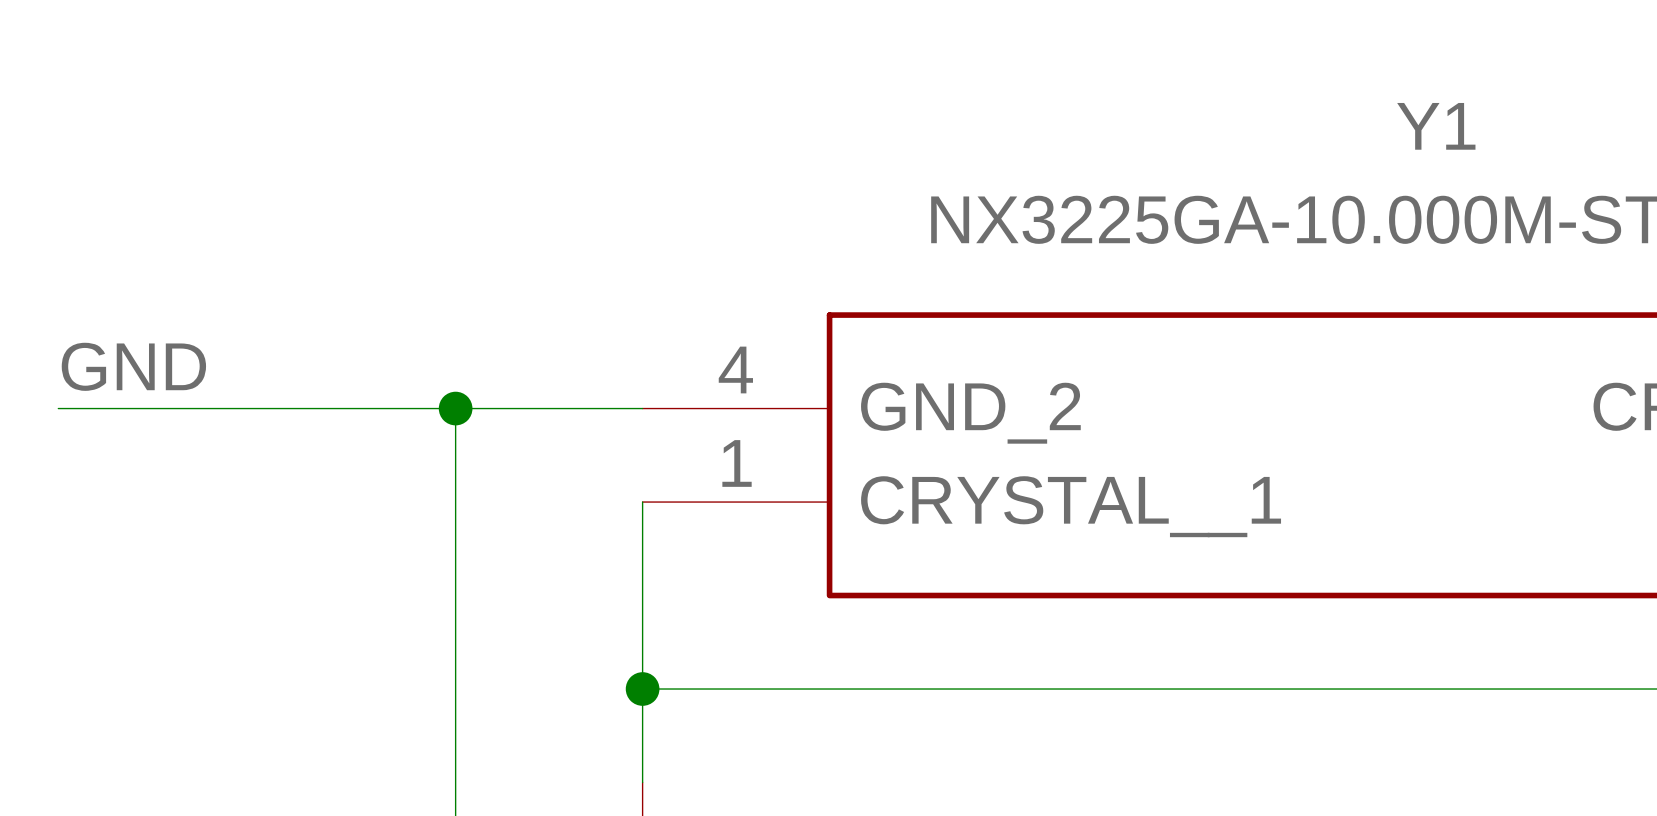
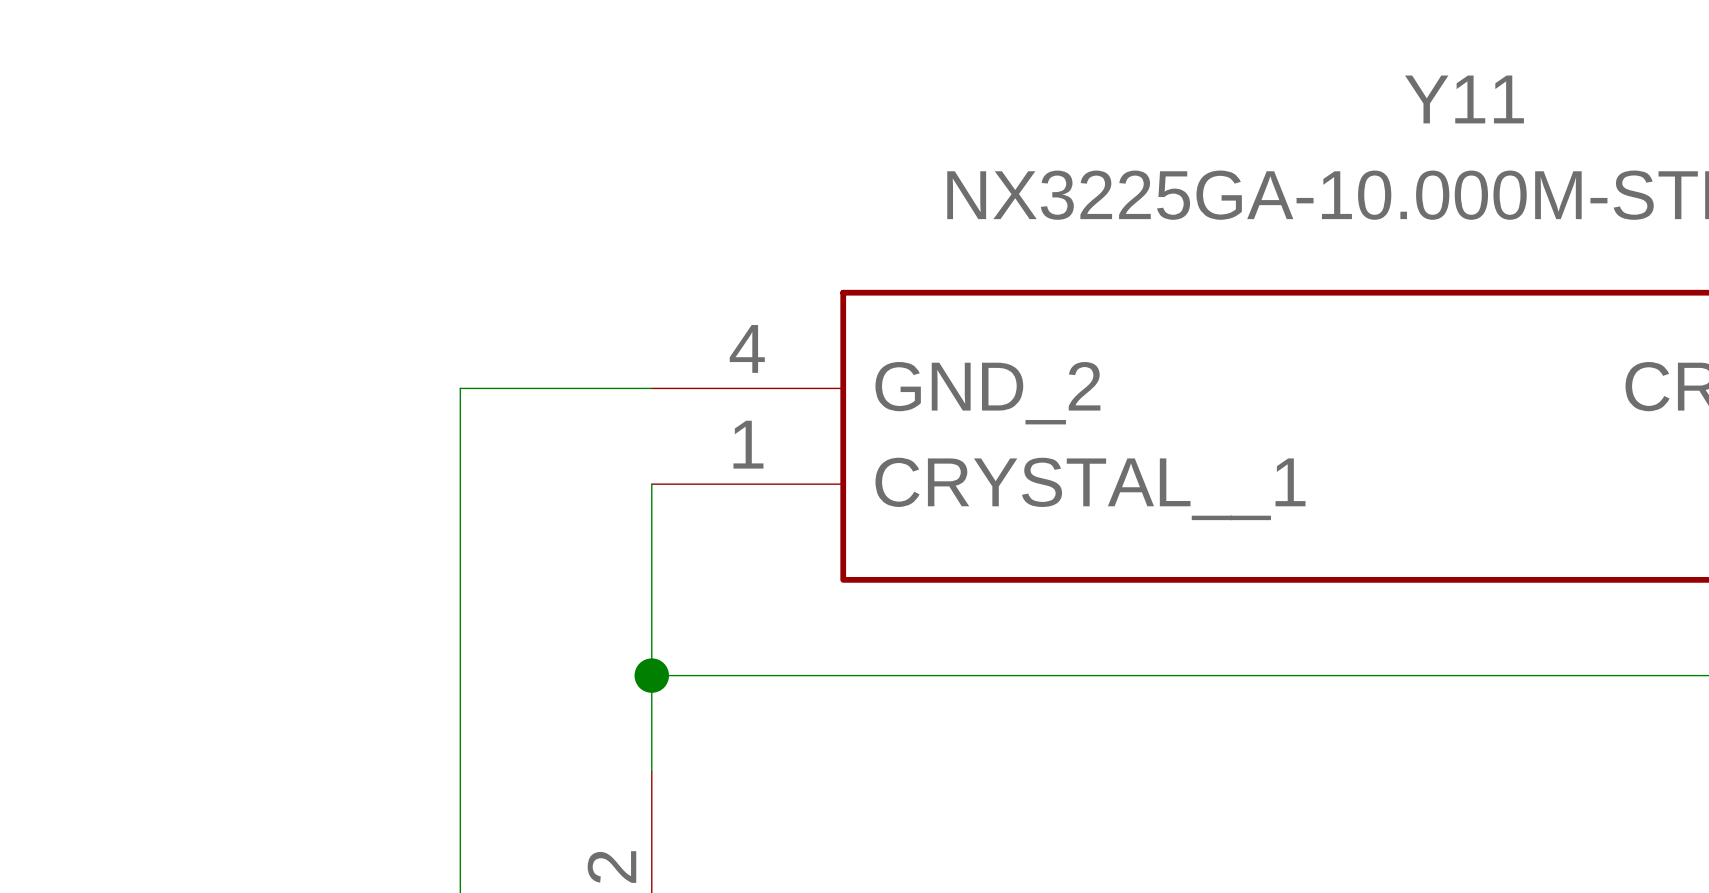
Y1 name: Y1 (1436, 126) -> Y11 (1464, 99)
label: GND (133, 366) -> none
wire: (58, 408) (455, 408) -> none
junction: (455, 408) -> none

